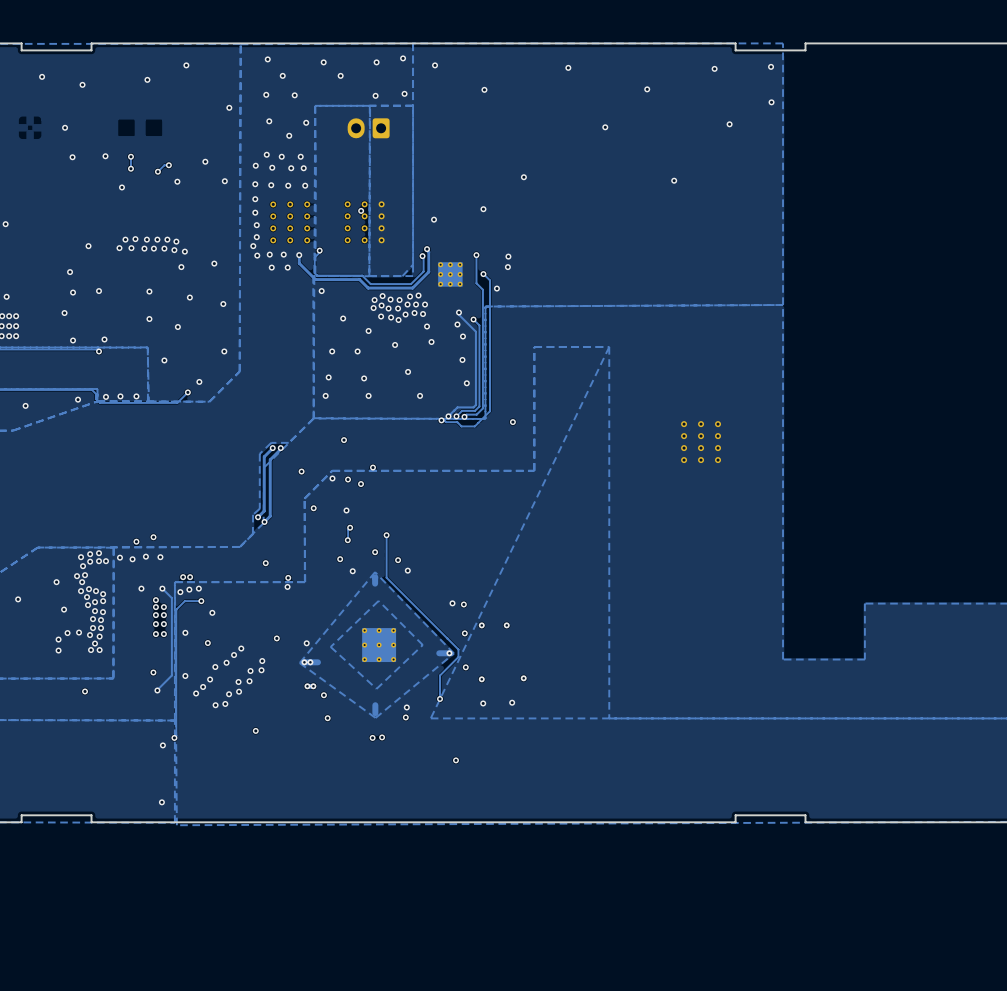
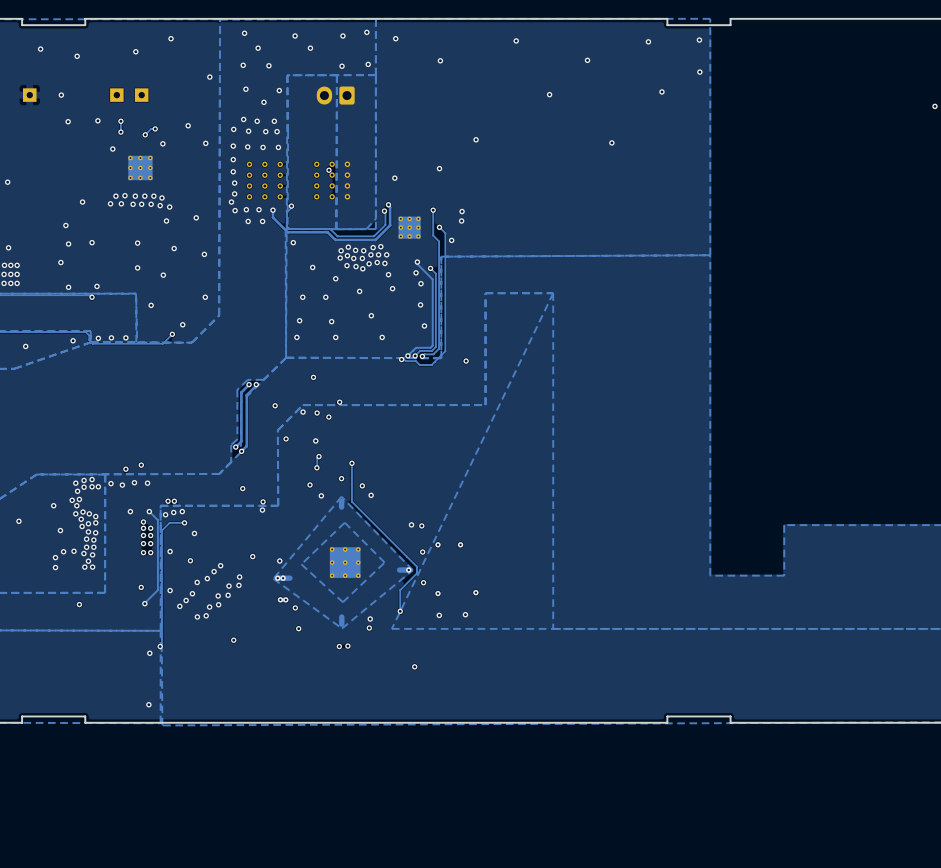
part: none -> (29, 95)
part: none -> (116, 95)
part: none -> (141, 95)
part: none -> (140, 167)
part: (701, 442) -> none

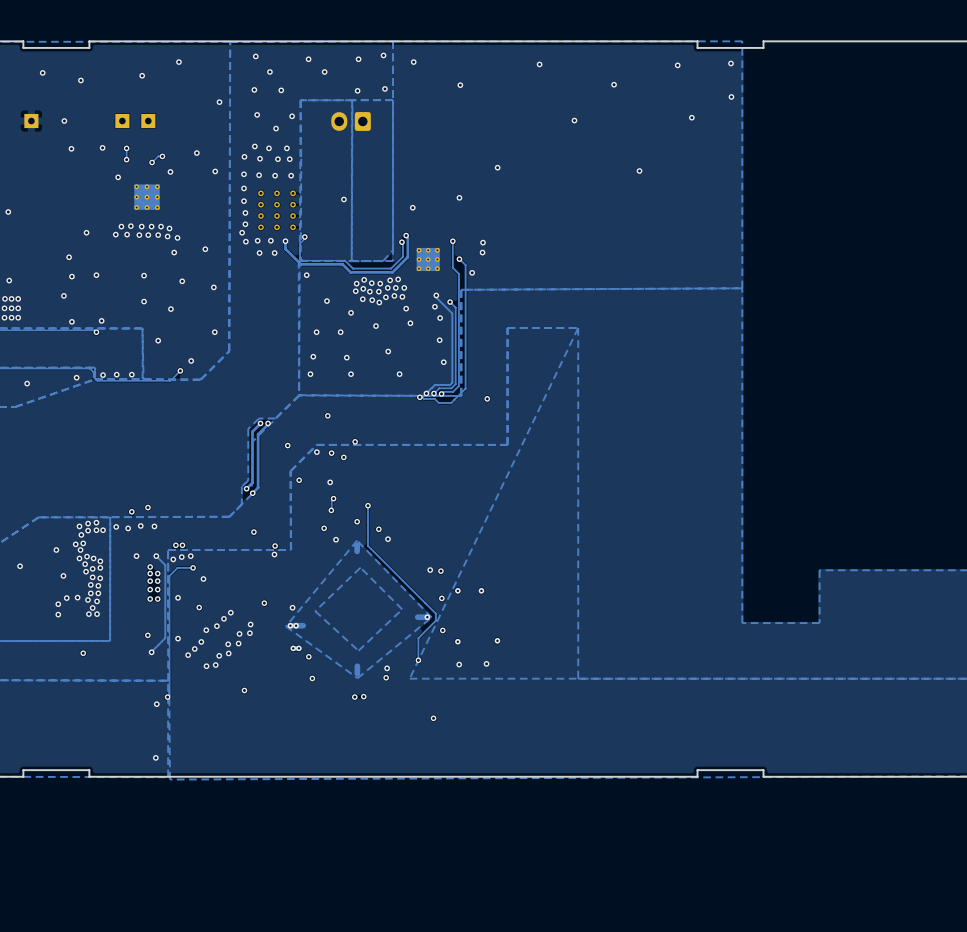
part: (332, 180) -> none
part: (345, 562) -> none

